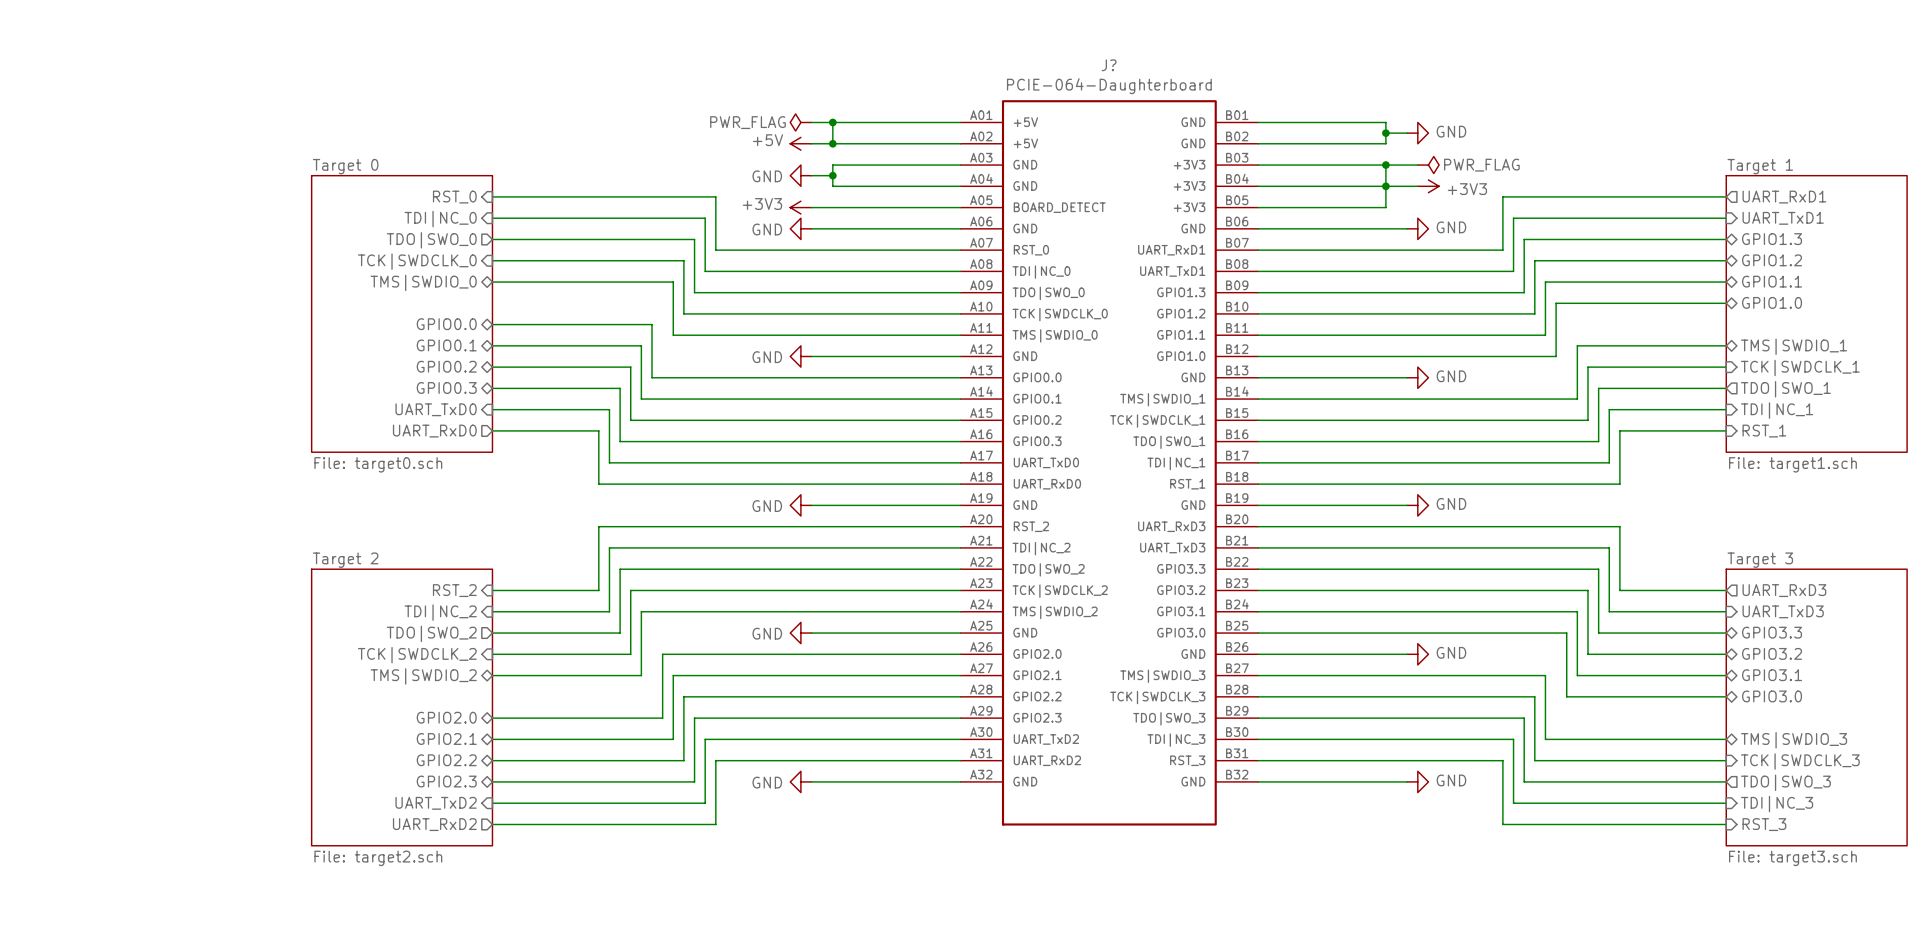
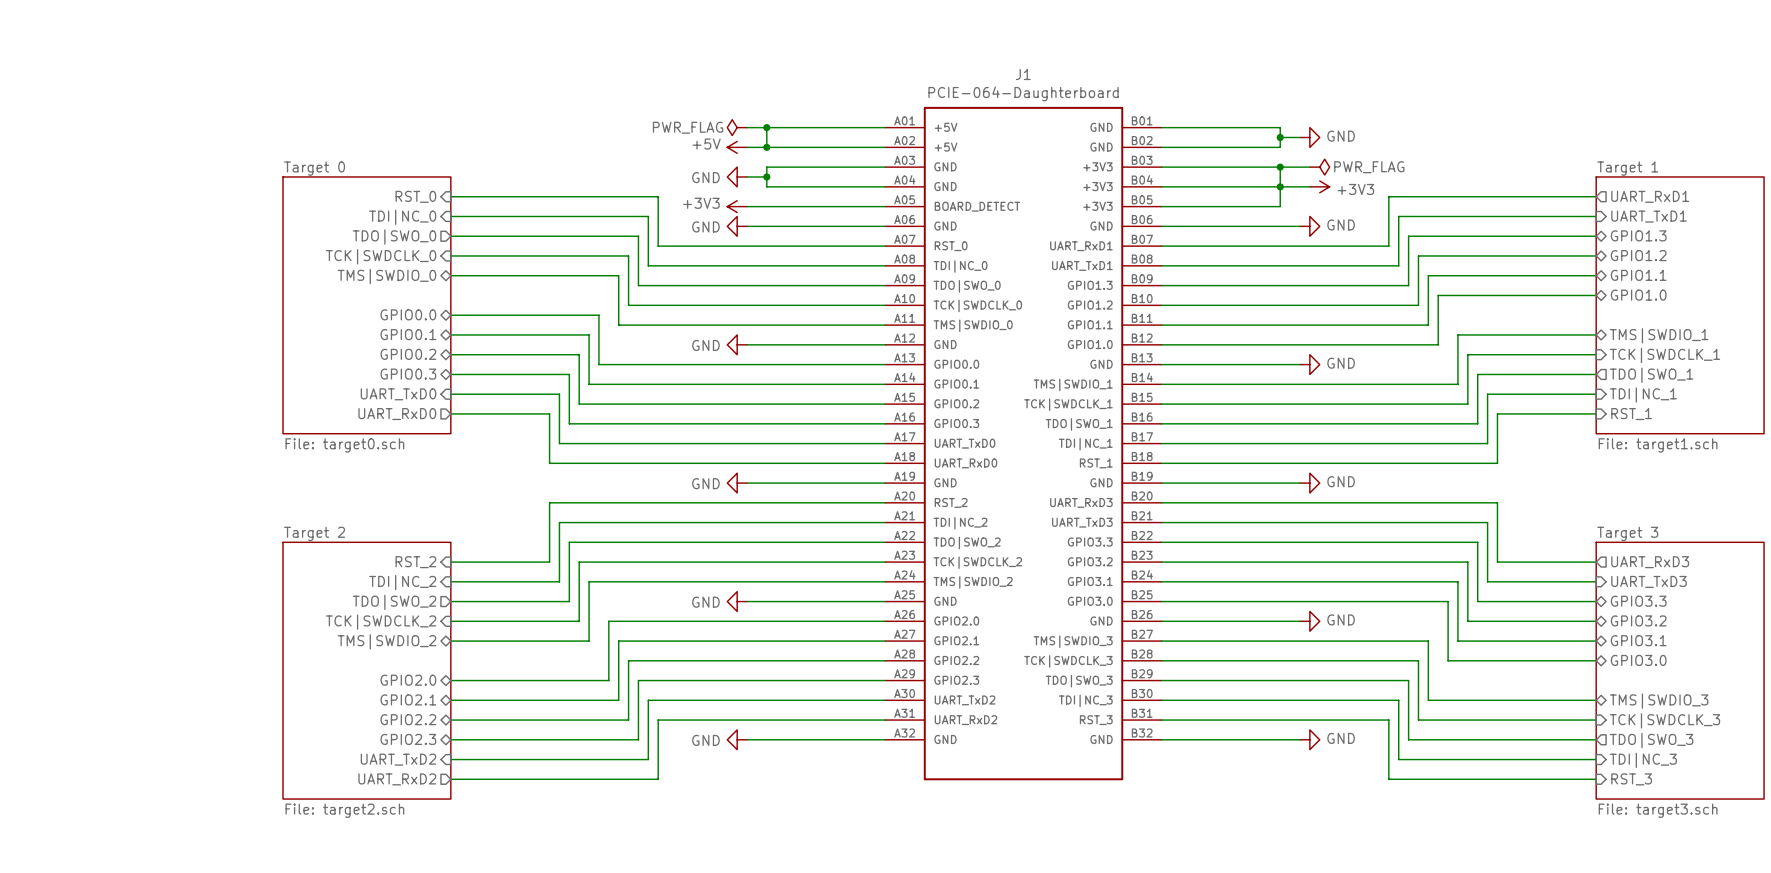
J? name: J? (1109, 65) -> J1 (1023, 74)

